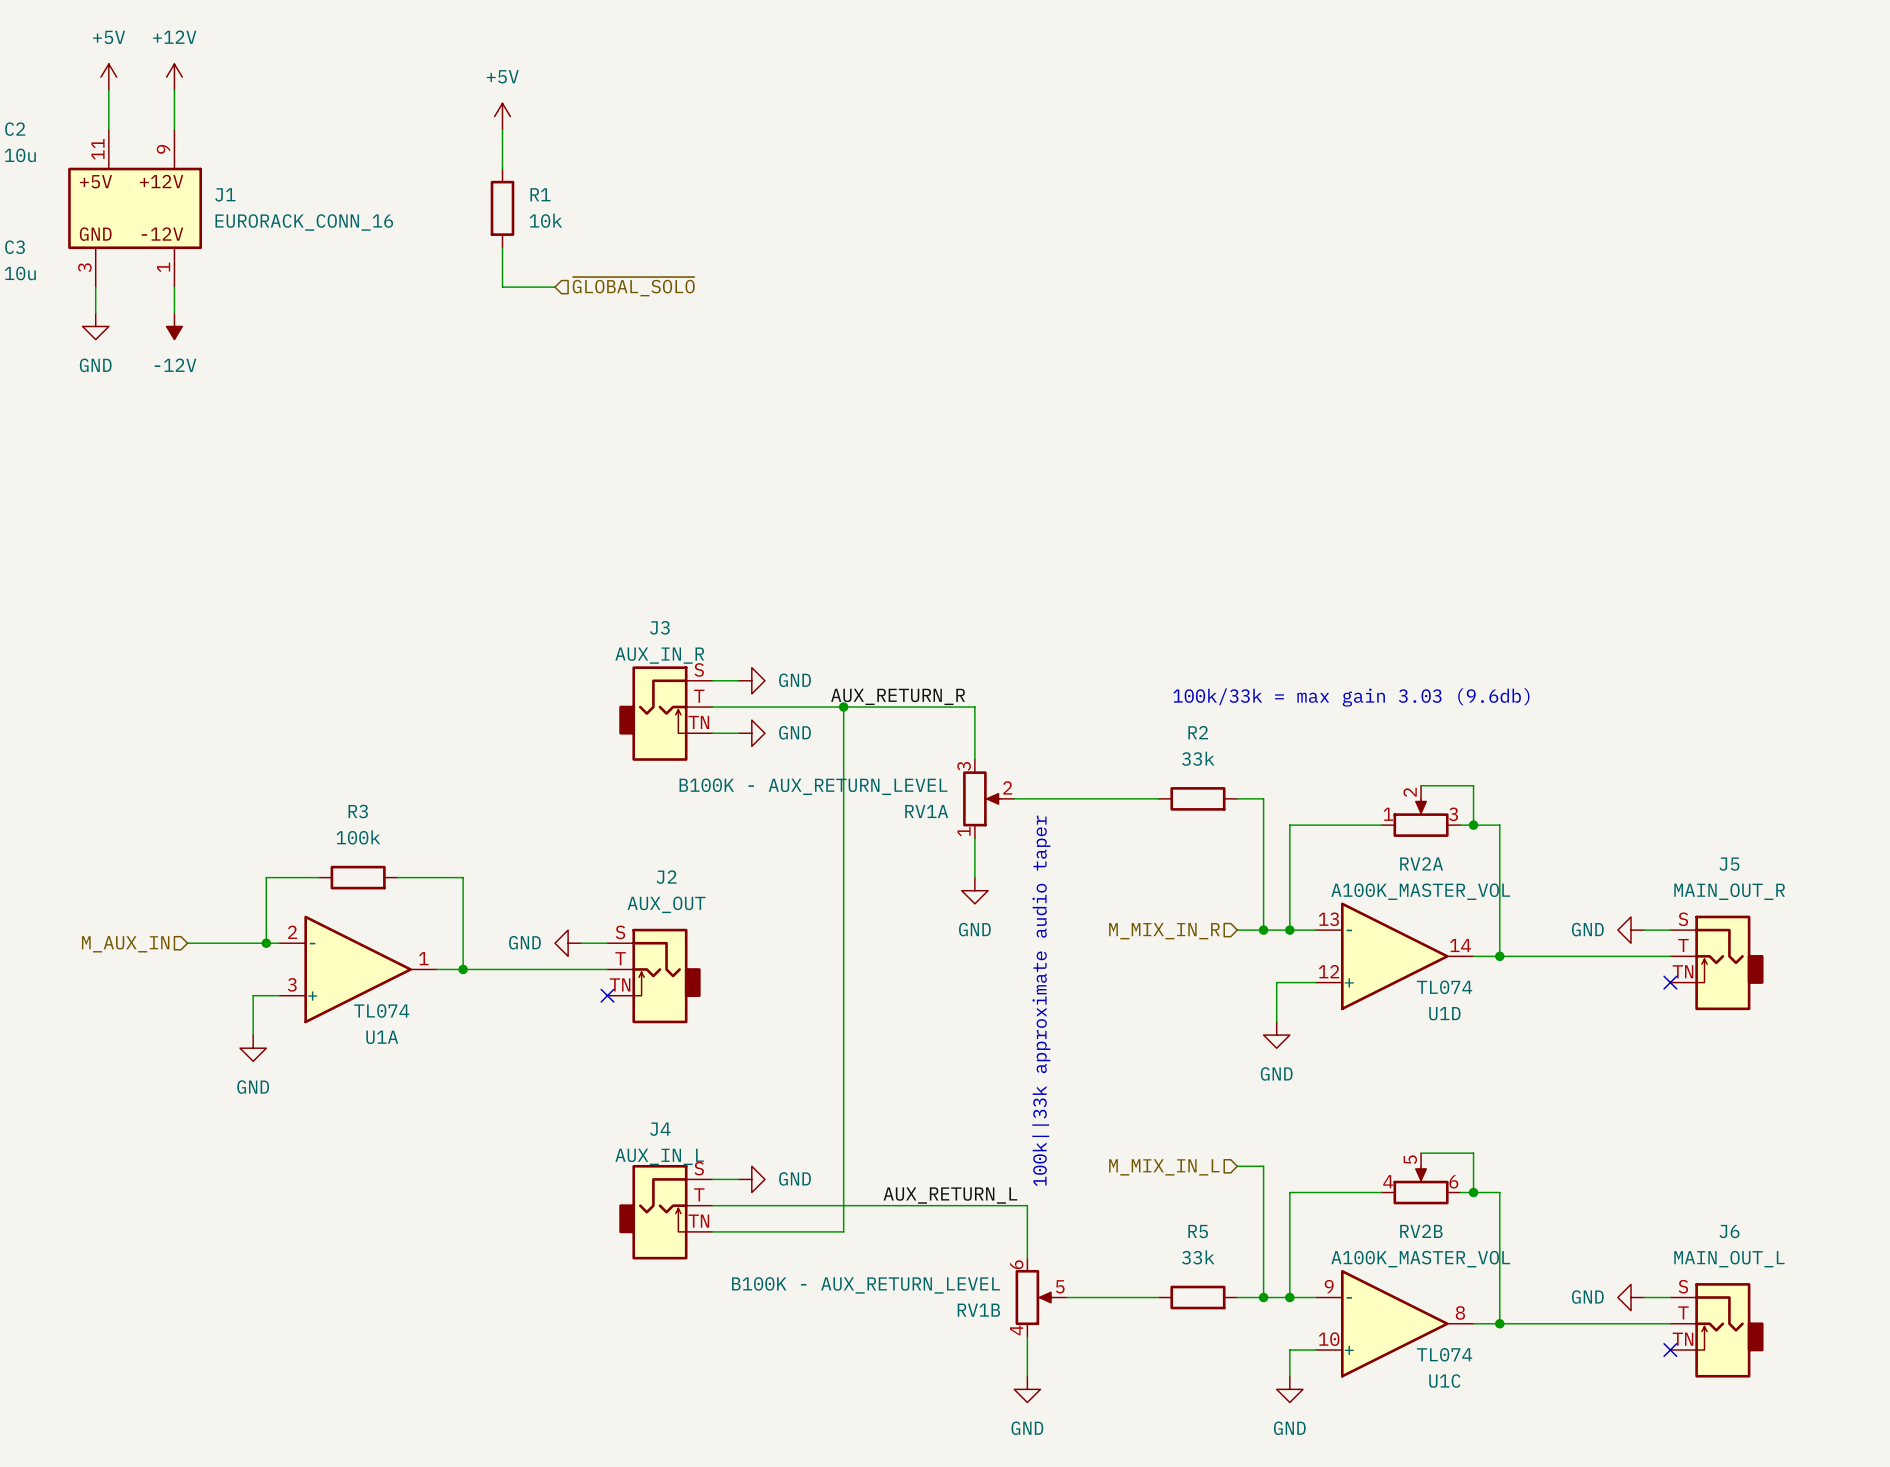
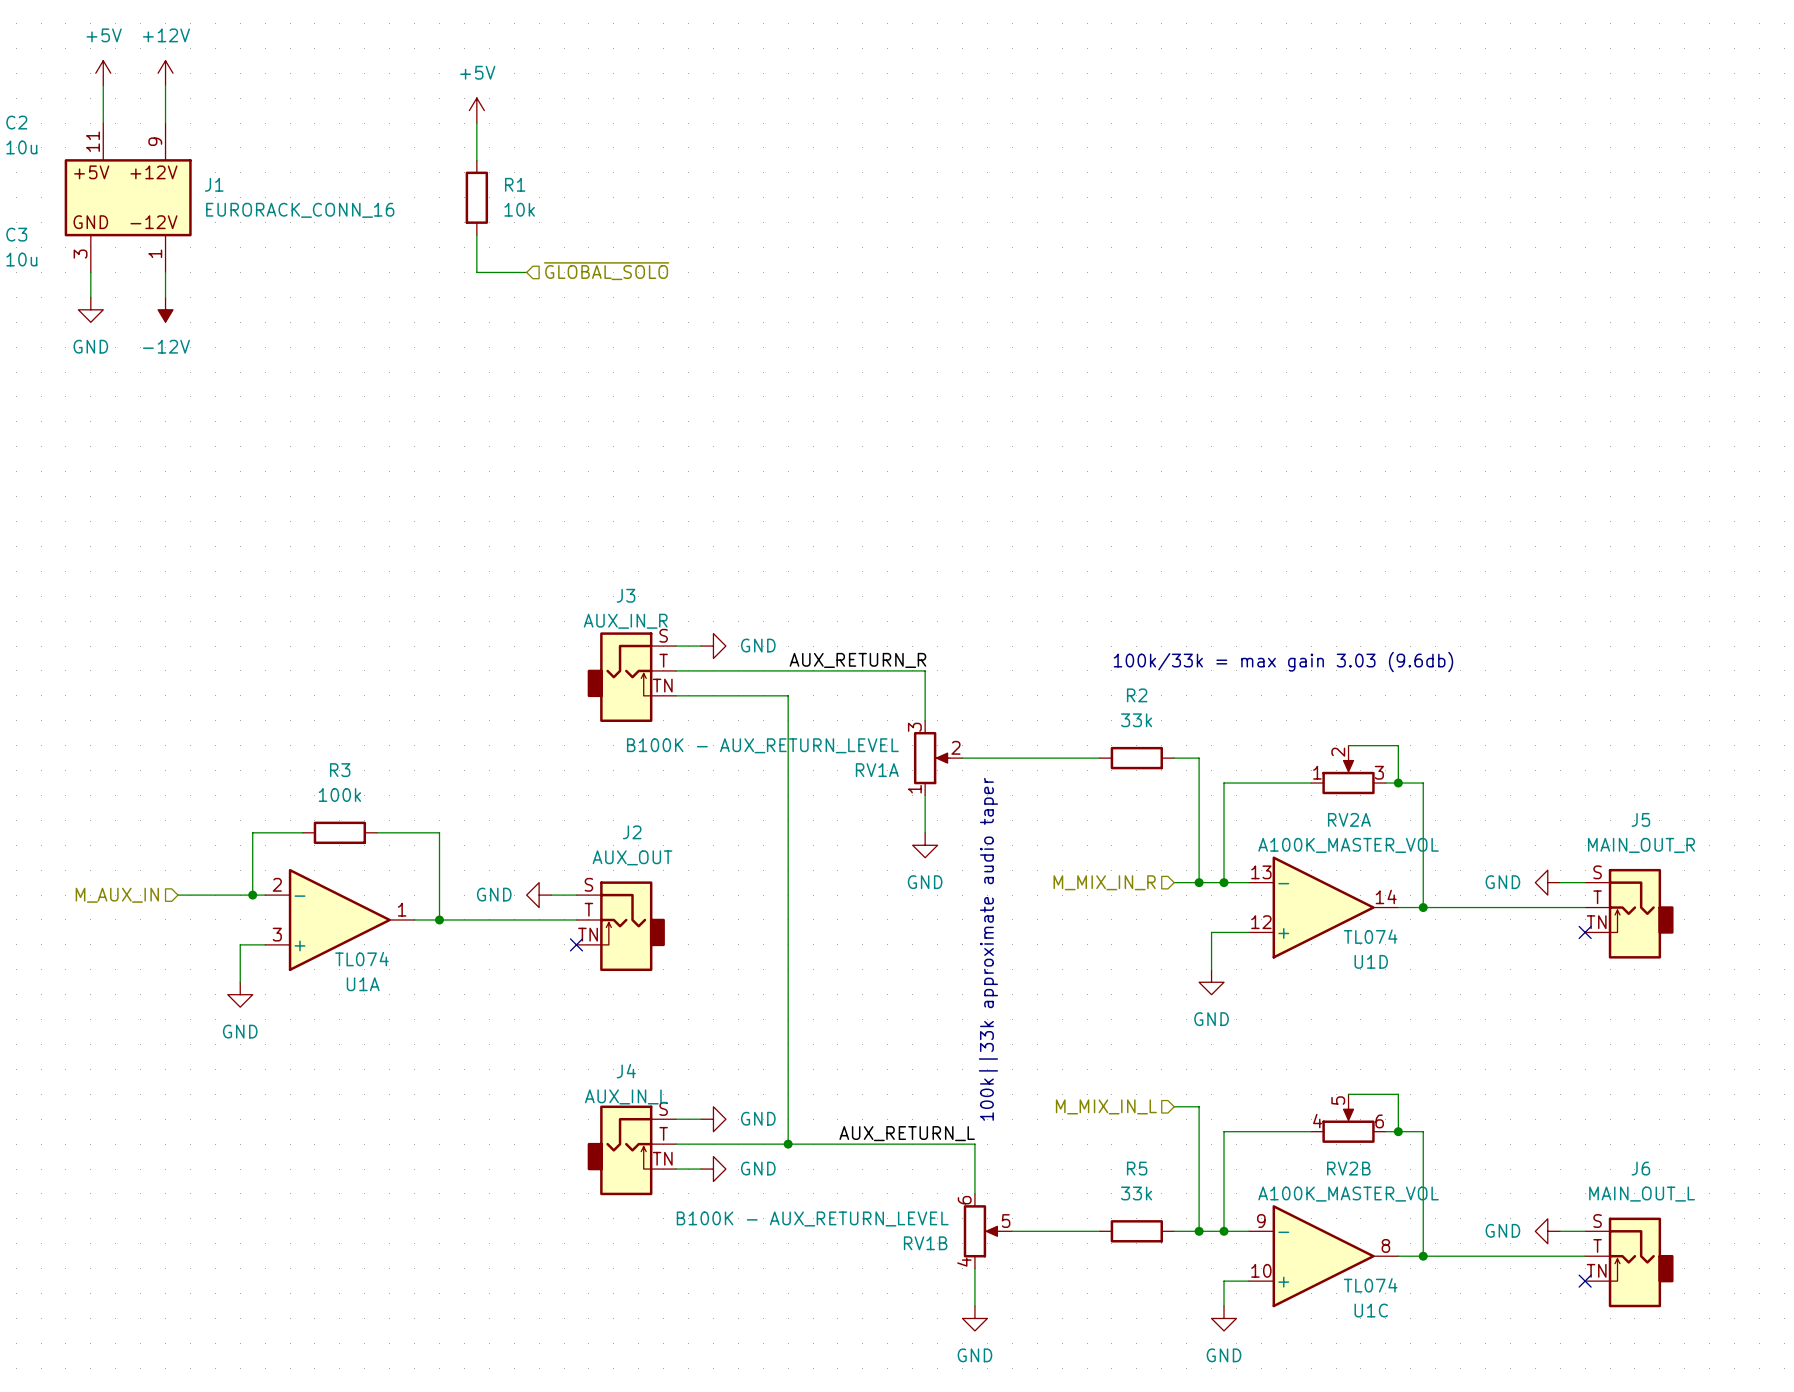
wire: (843, 707) (843, 1231) (738, 1231) -> none
junction: (843, 707) -> none
wire: none -> (700, 695) (788, 695) (788, 1144)
power symbol: GND (751, 733) -> none
junction: none -> (788, 1144)
power symbol: none -> GND (713, 1169)

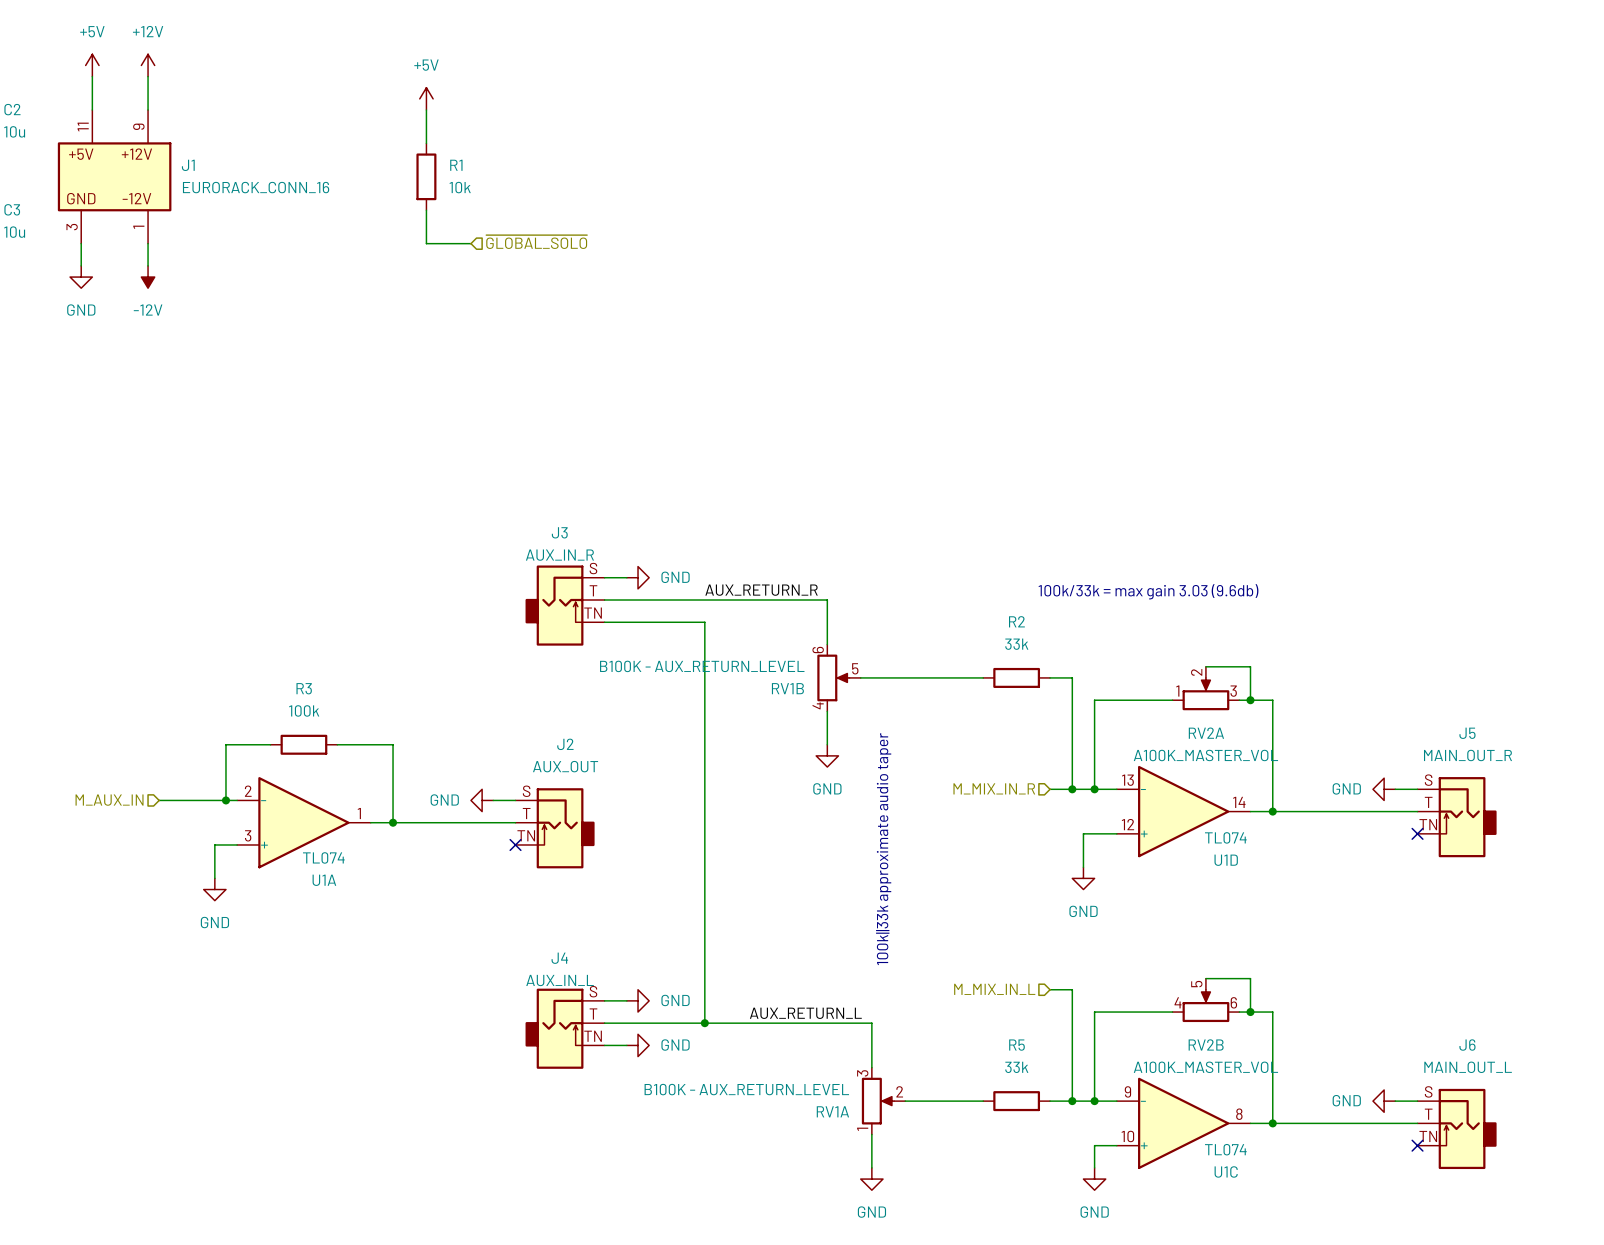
RV1A position: (938, 758) -> (883, 1101)
RV1B position: (988, 1231) -> (839, 677)

